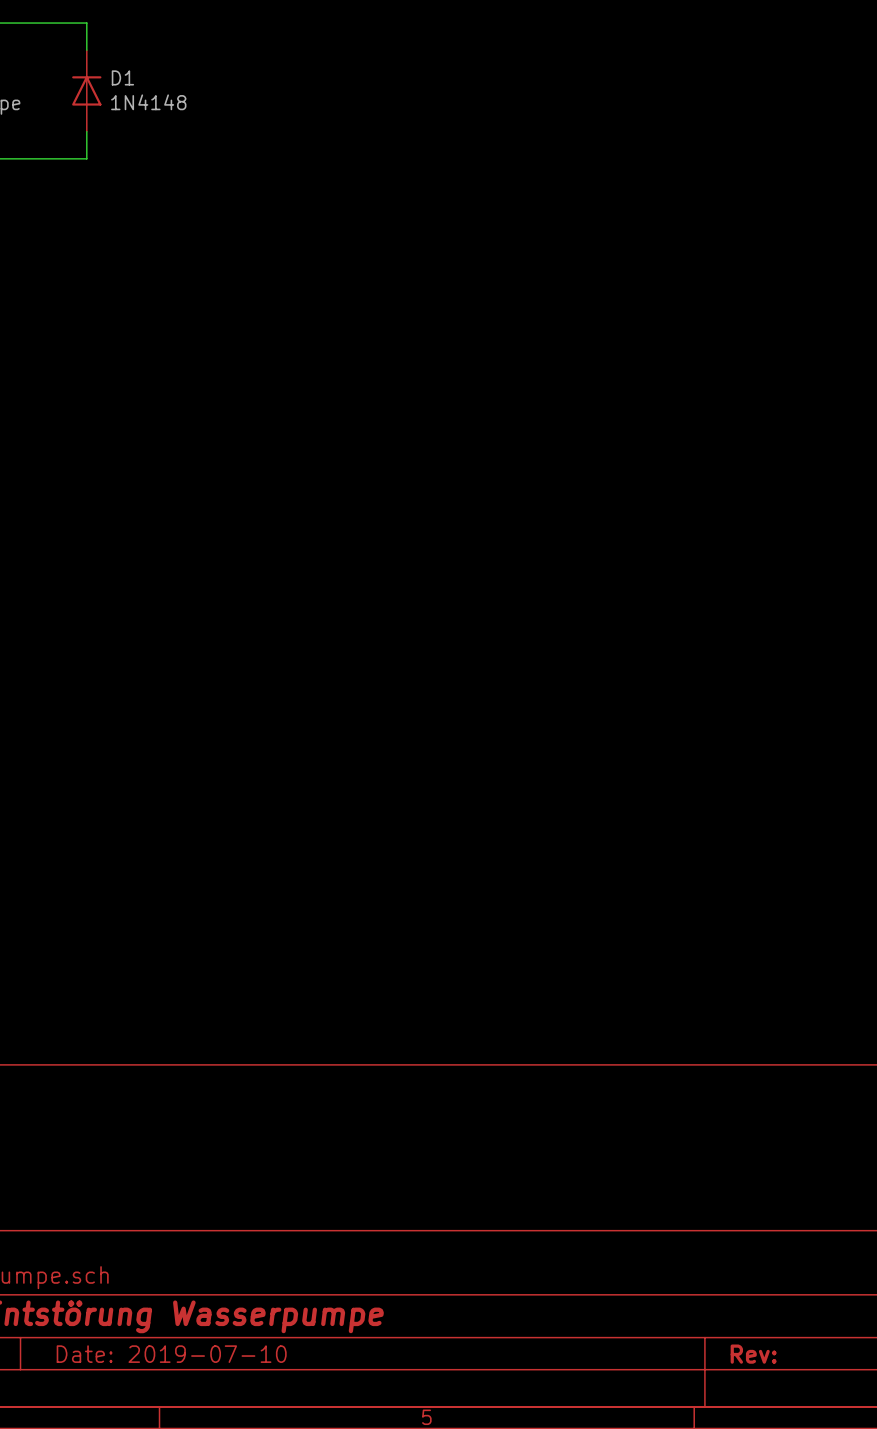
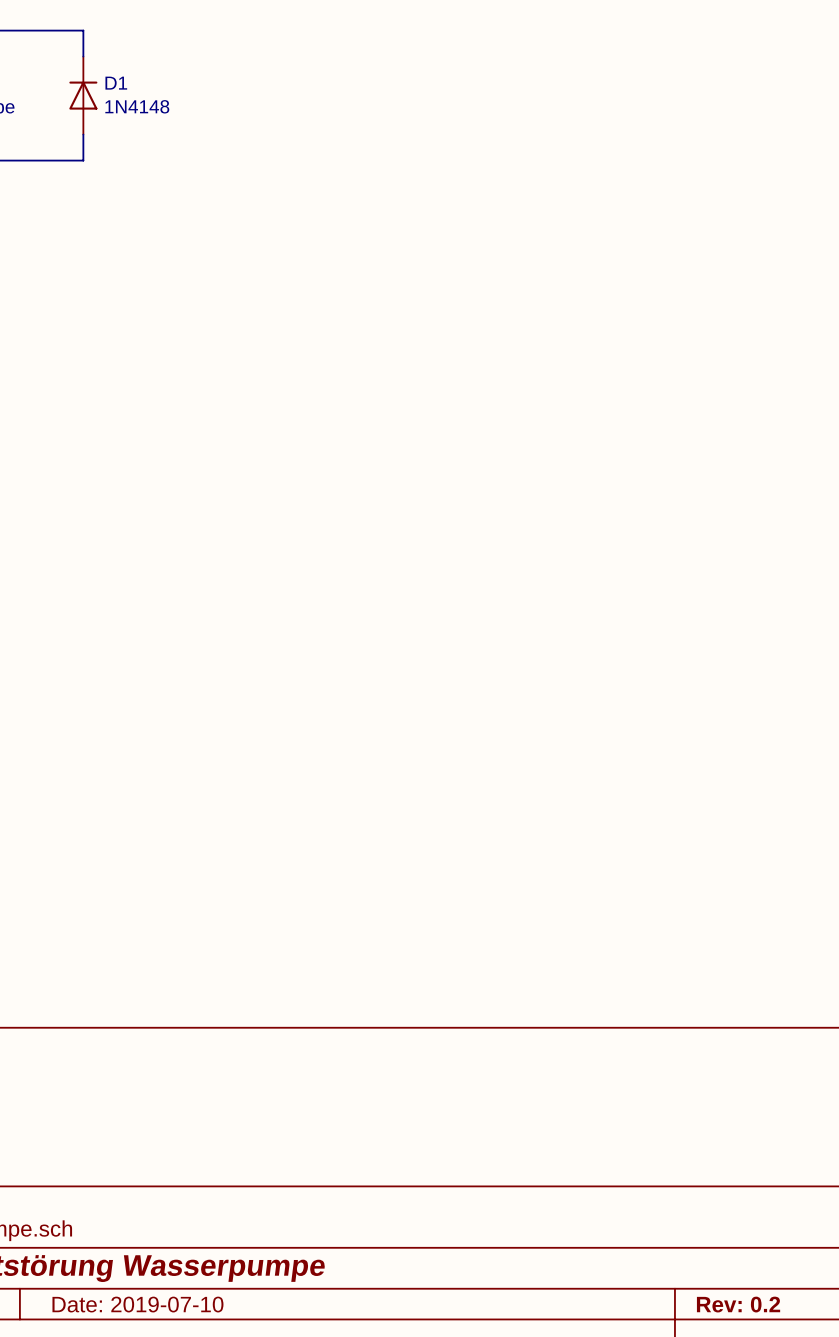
title block: Rev: (753, 1354) -> Rev: 0.2 (738, 1304)

